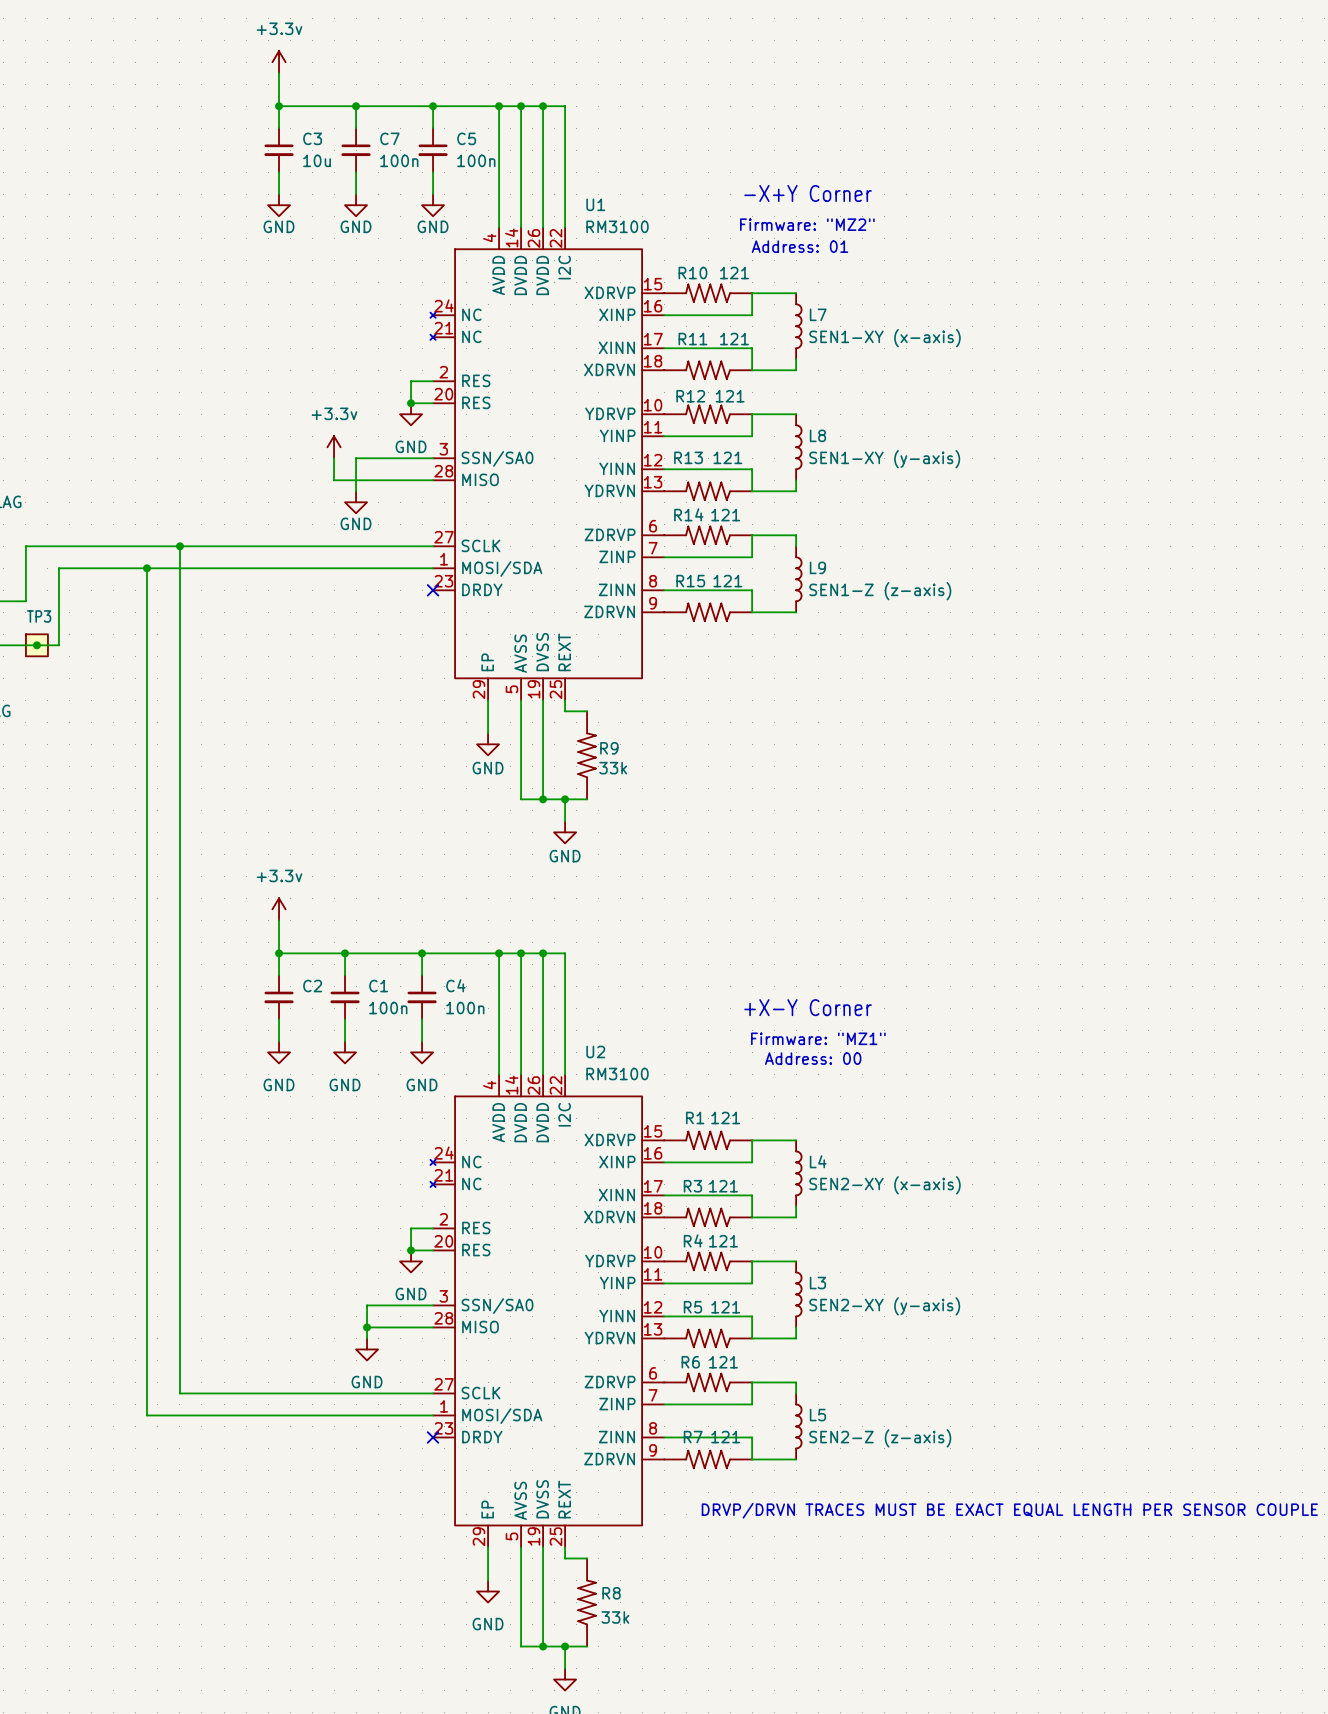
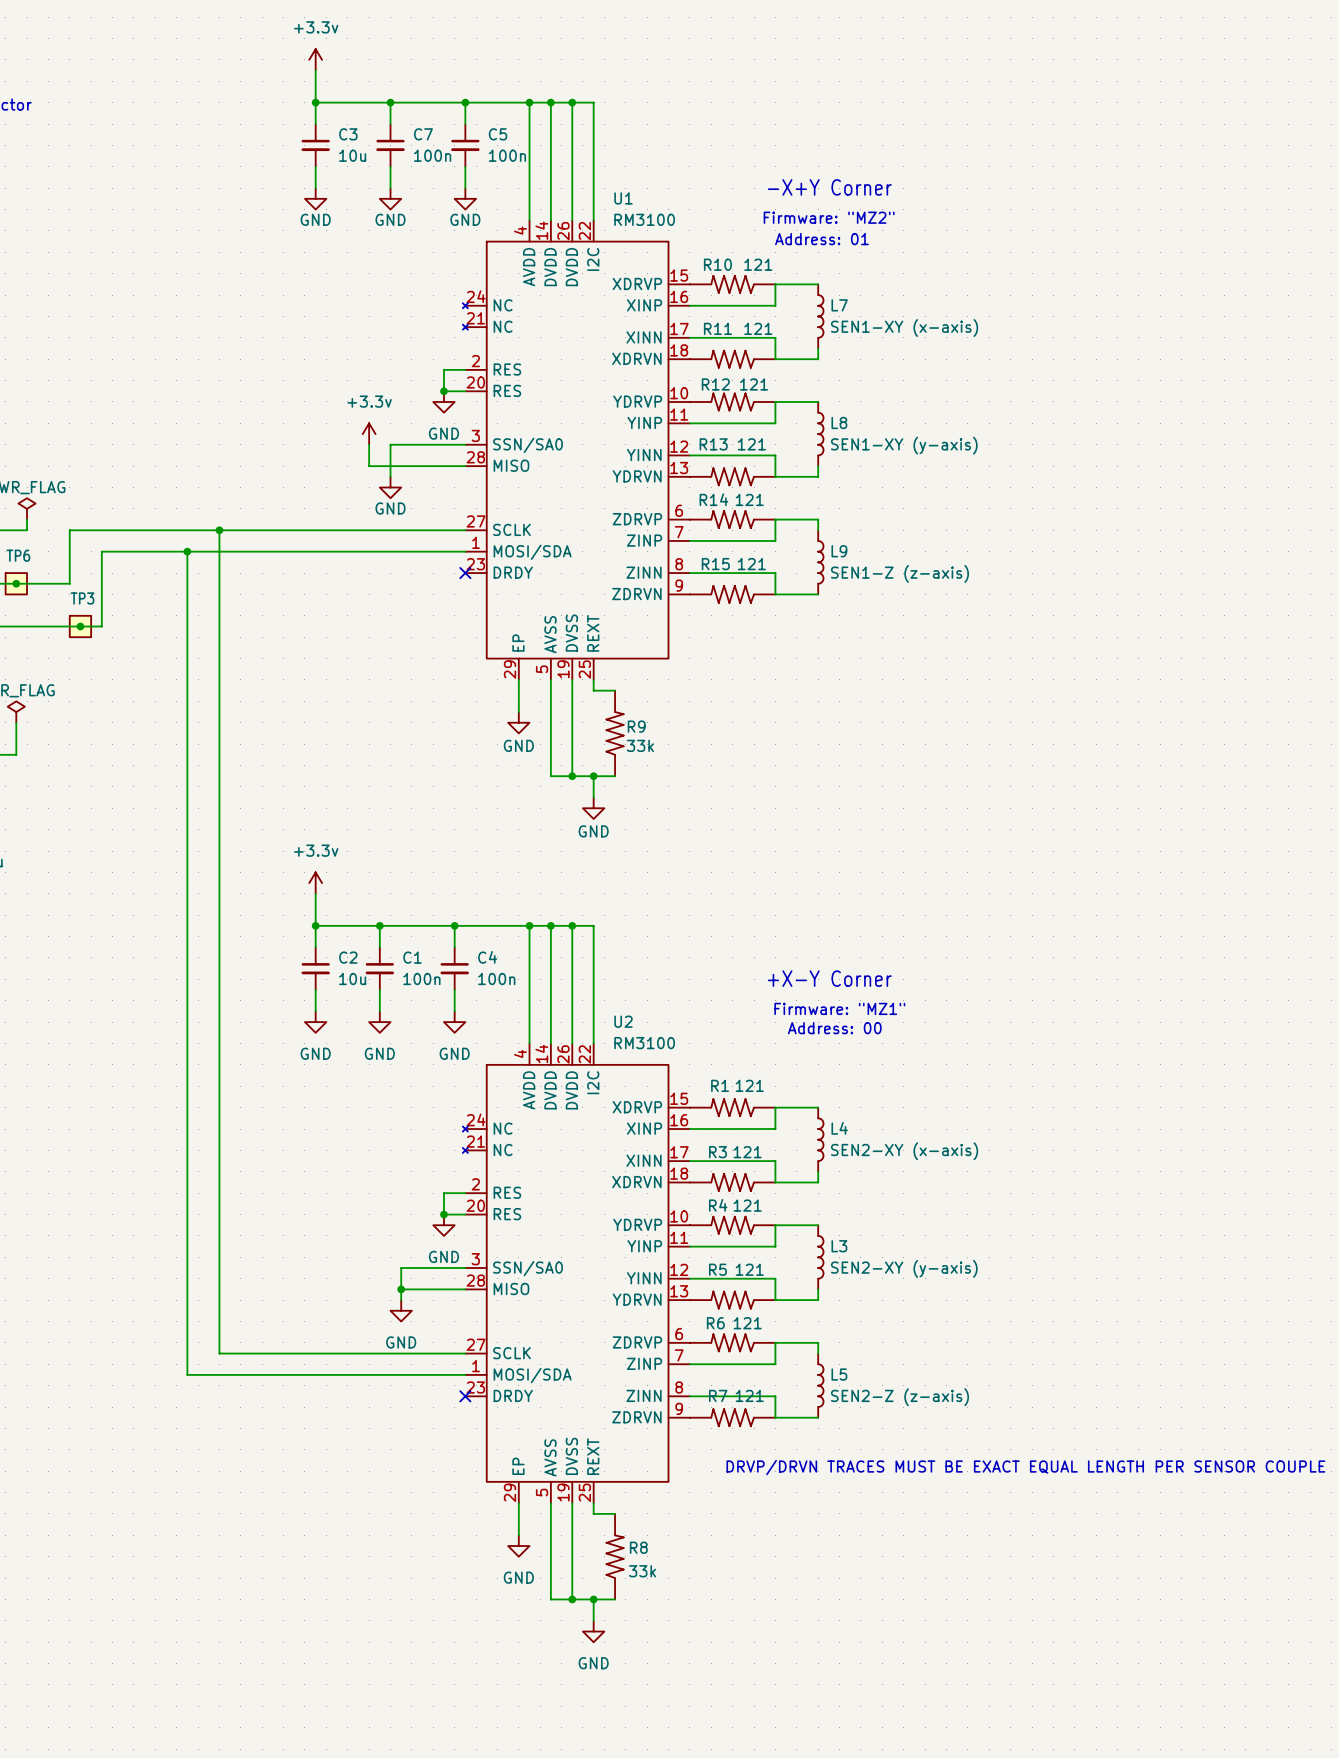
C2 value: none -> 10u (352, 978)

